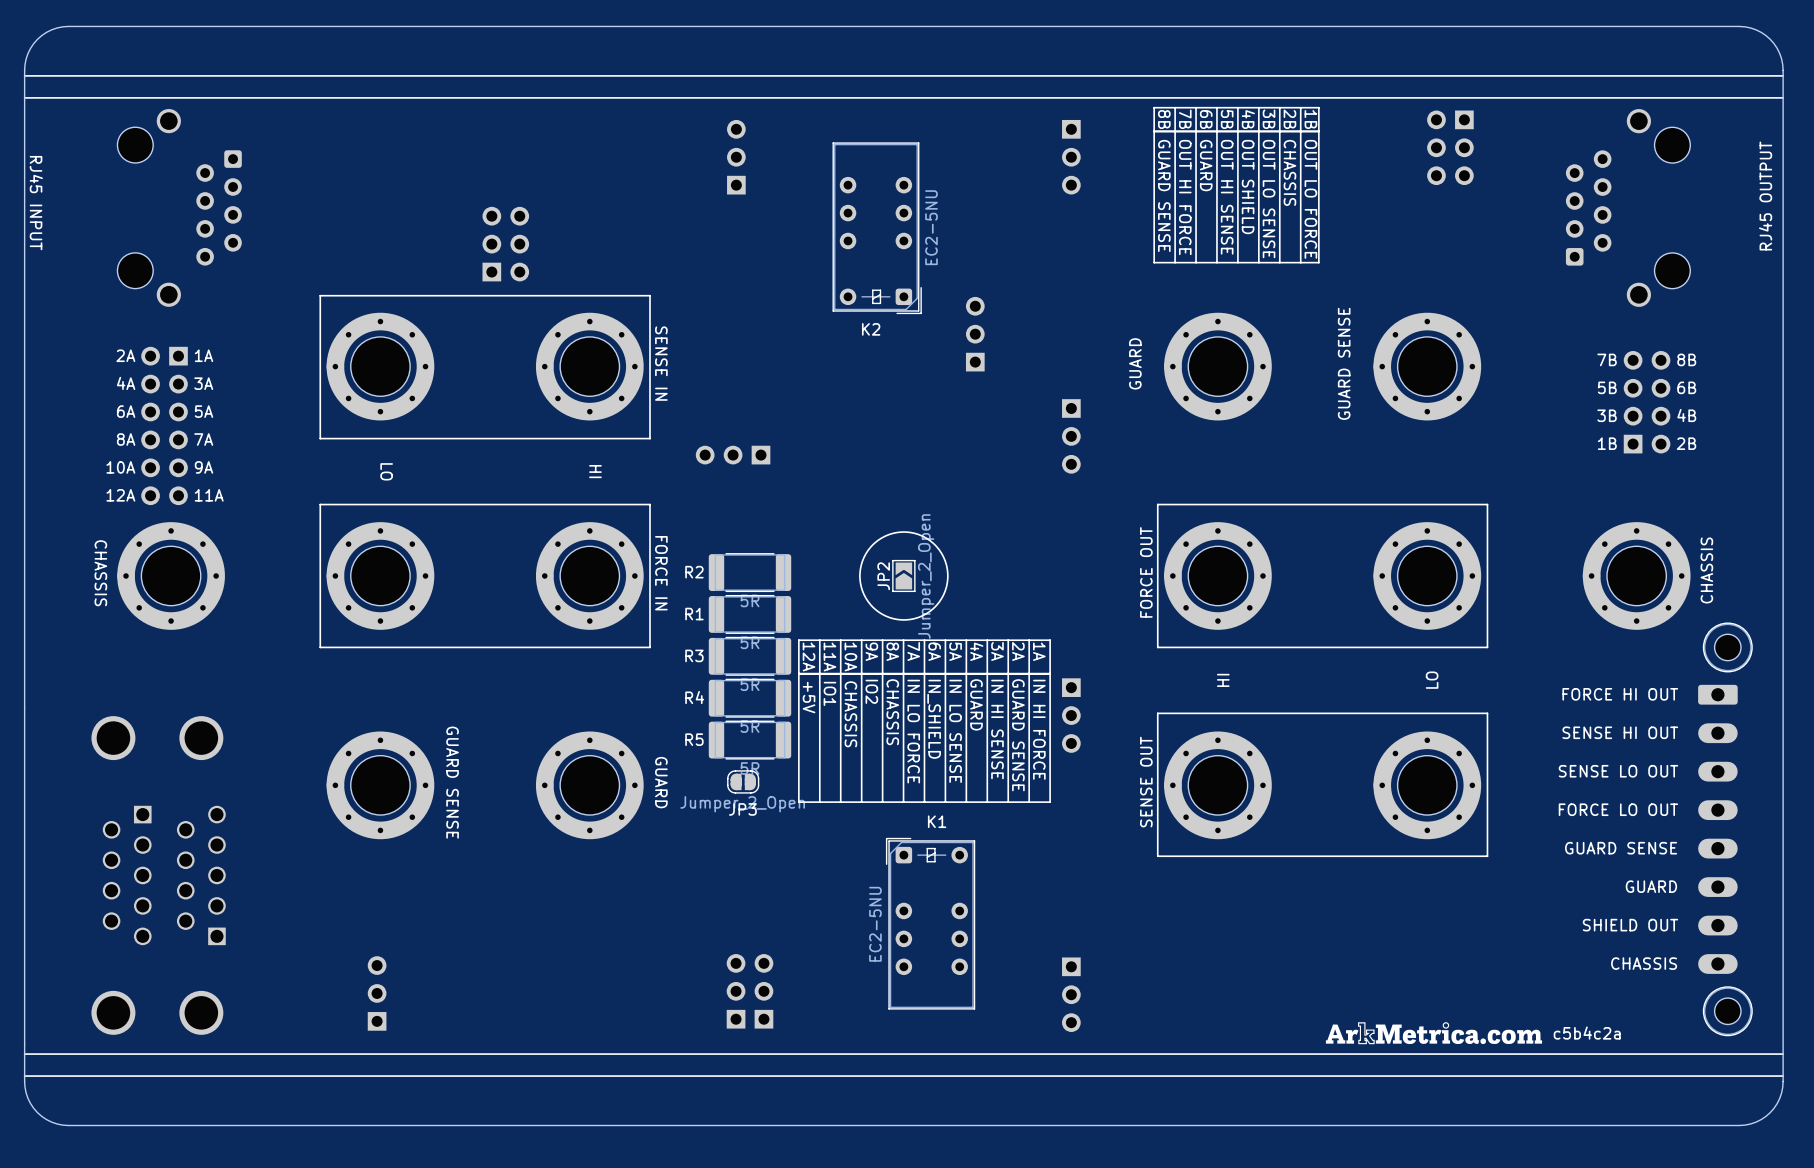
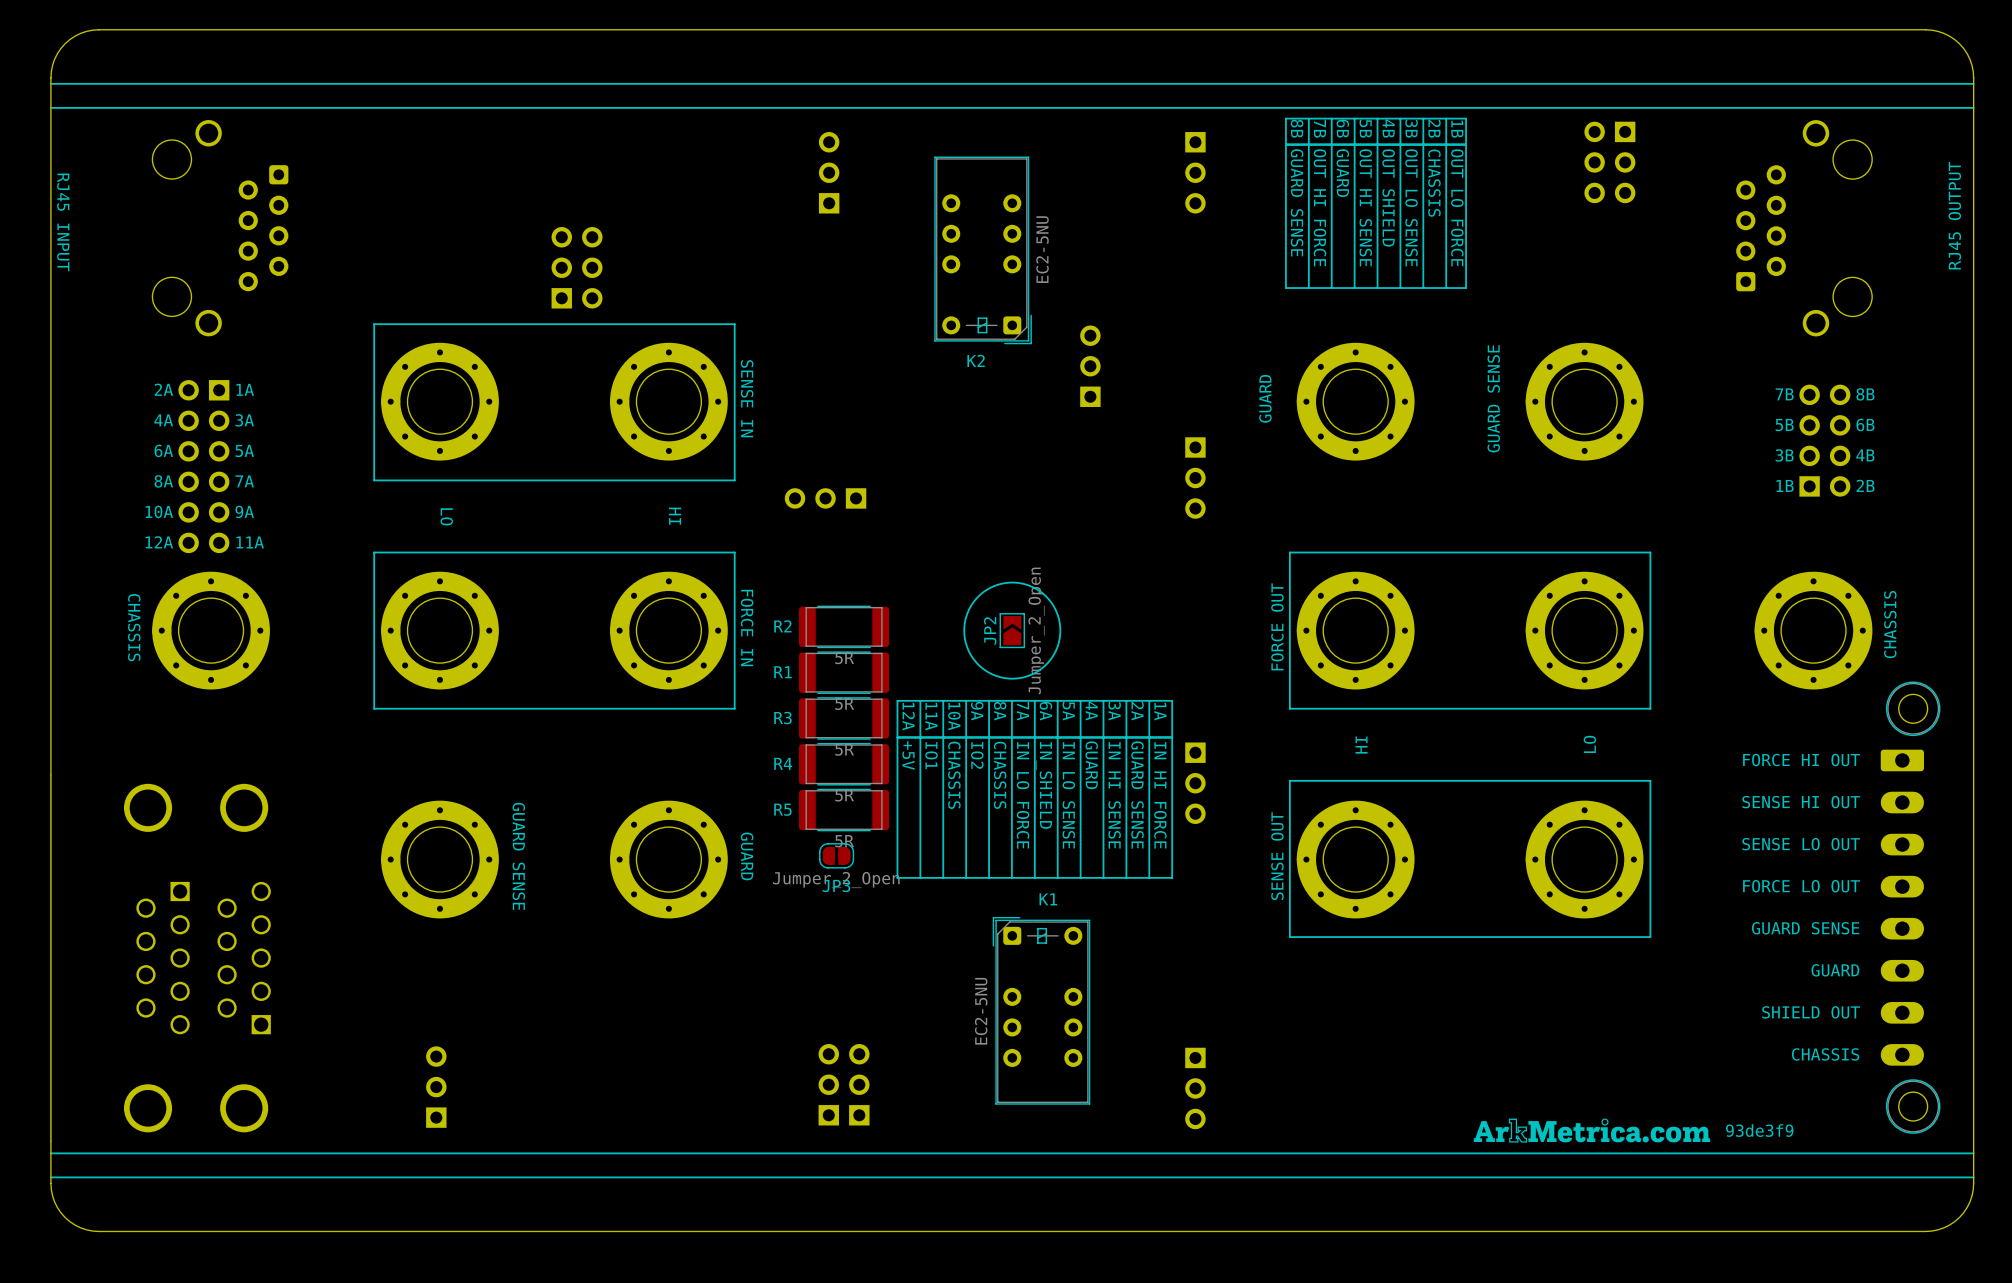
text: c5b4c2a (1587, 1033) -> 93de3f9 (1759, 1130)

